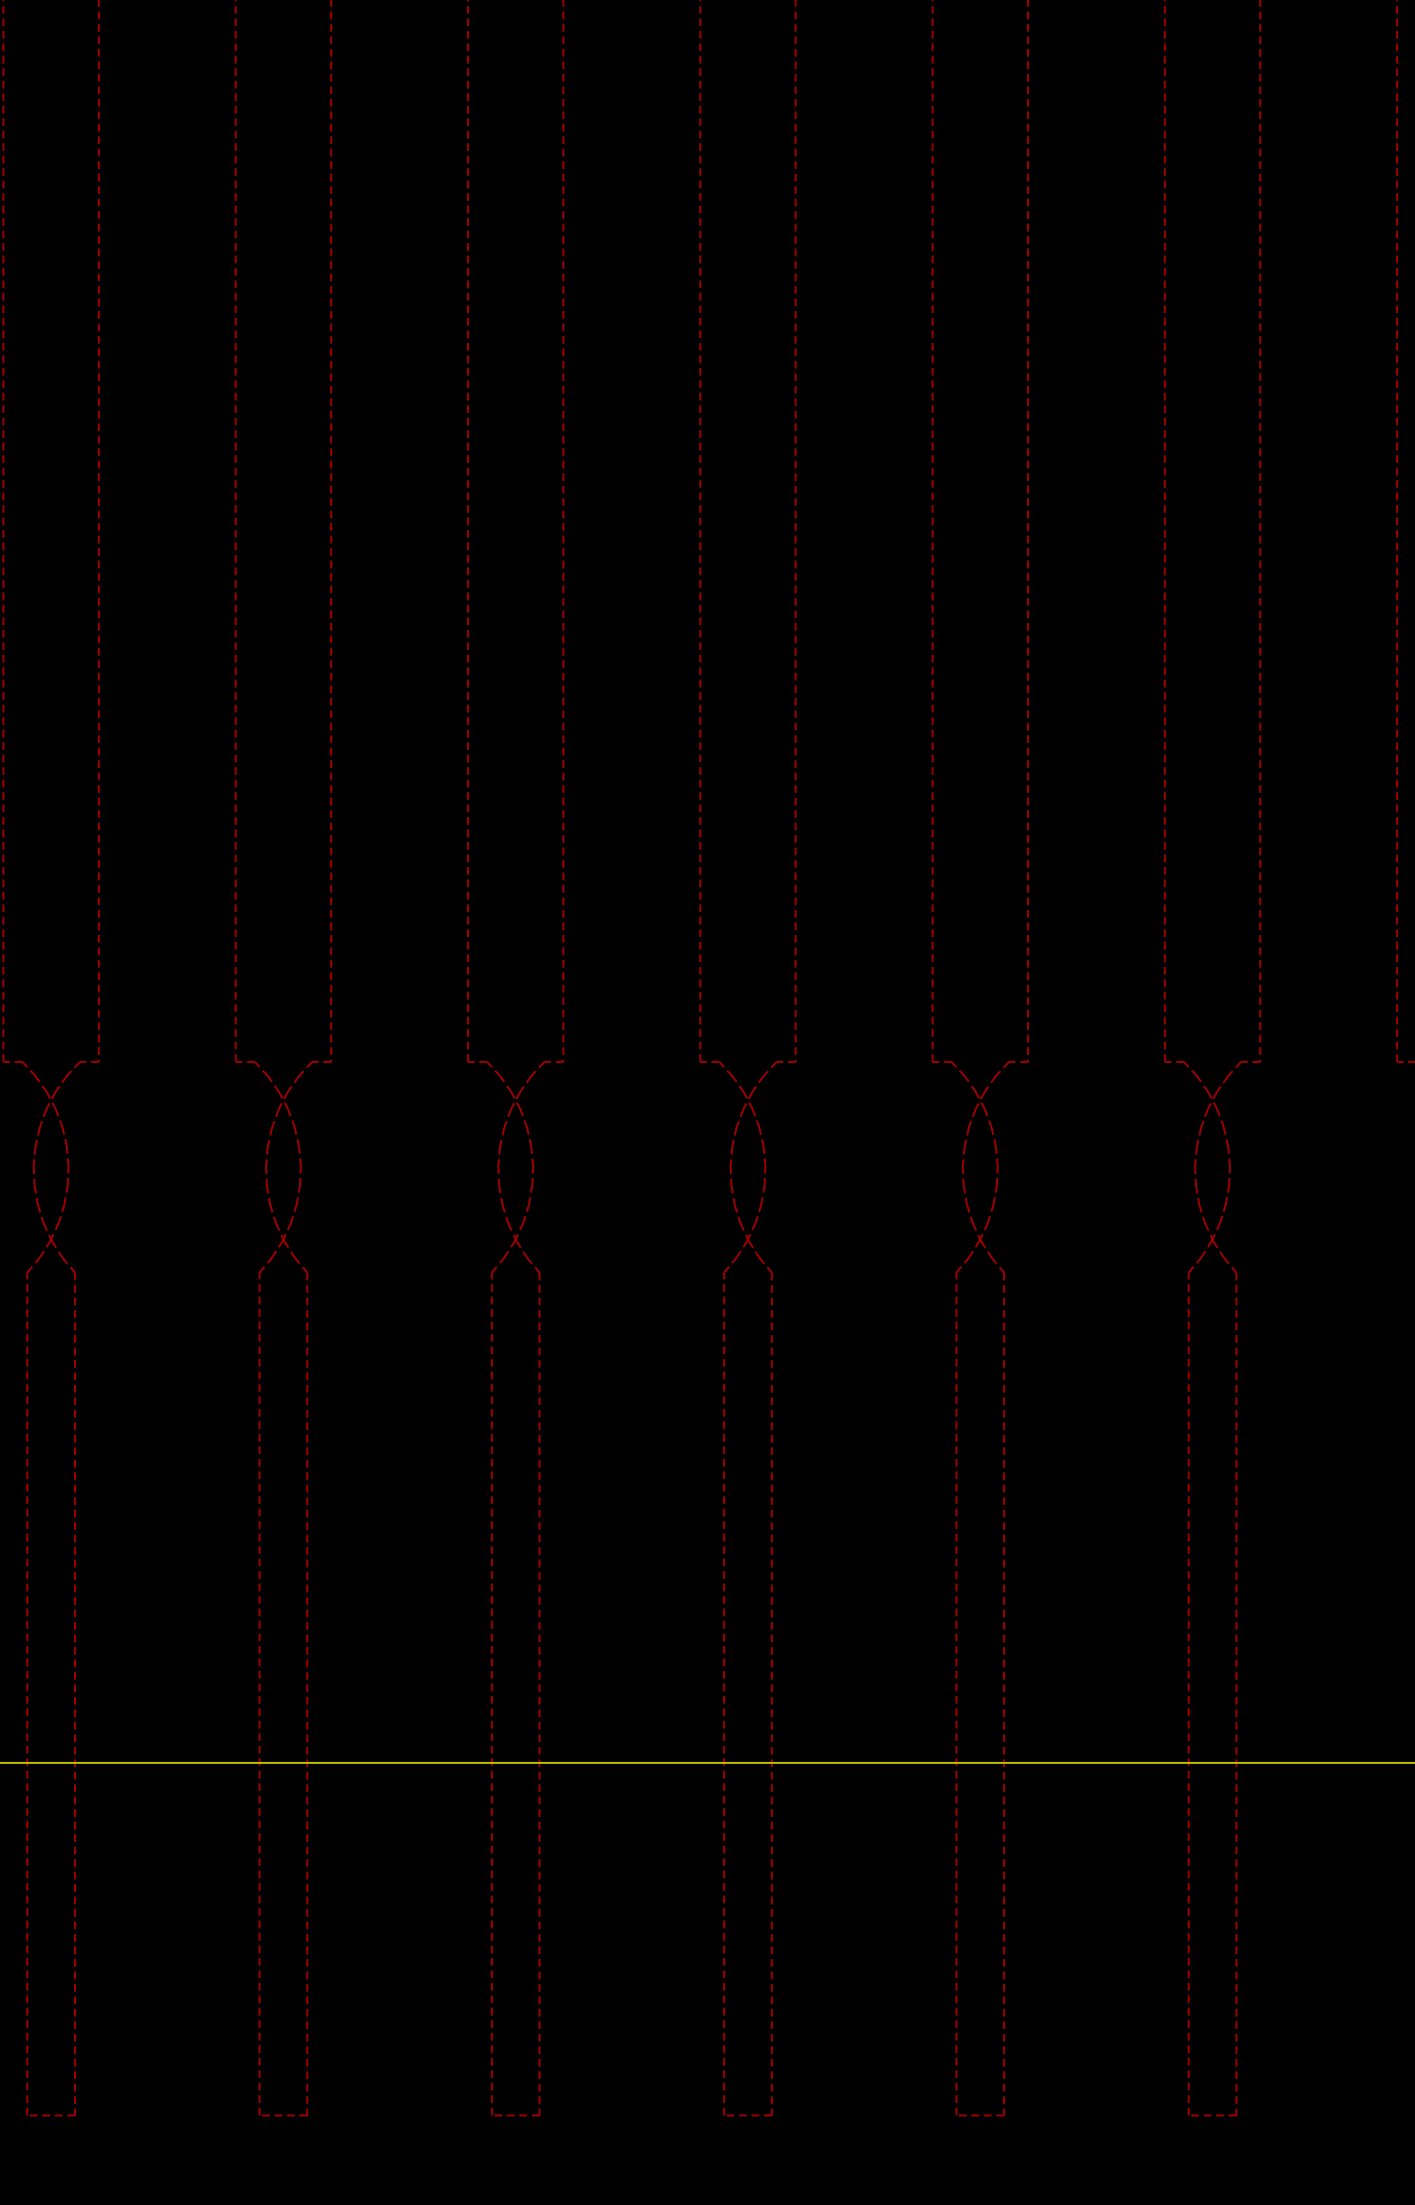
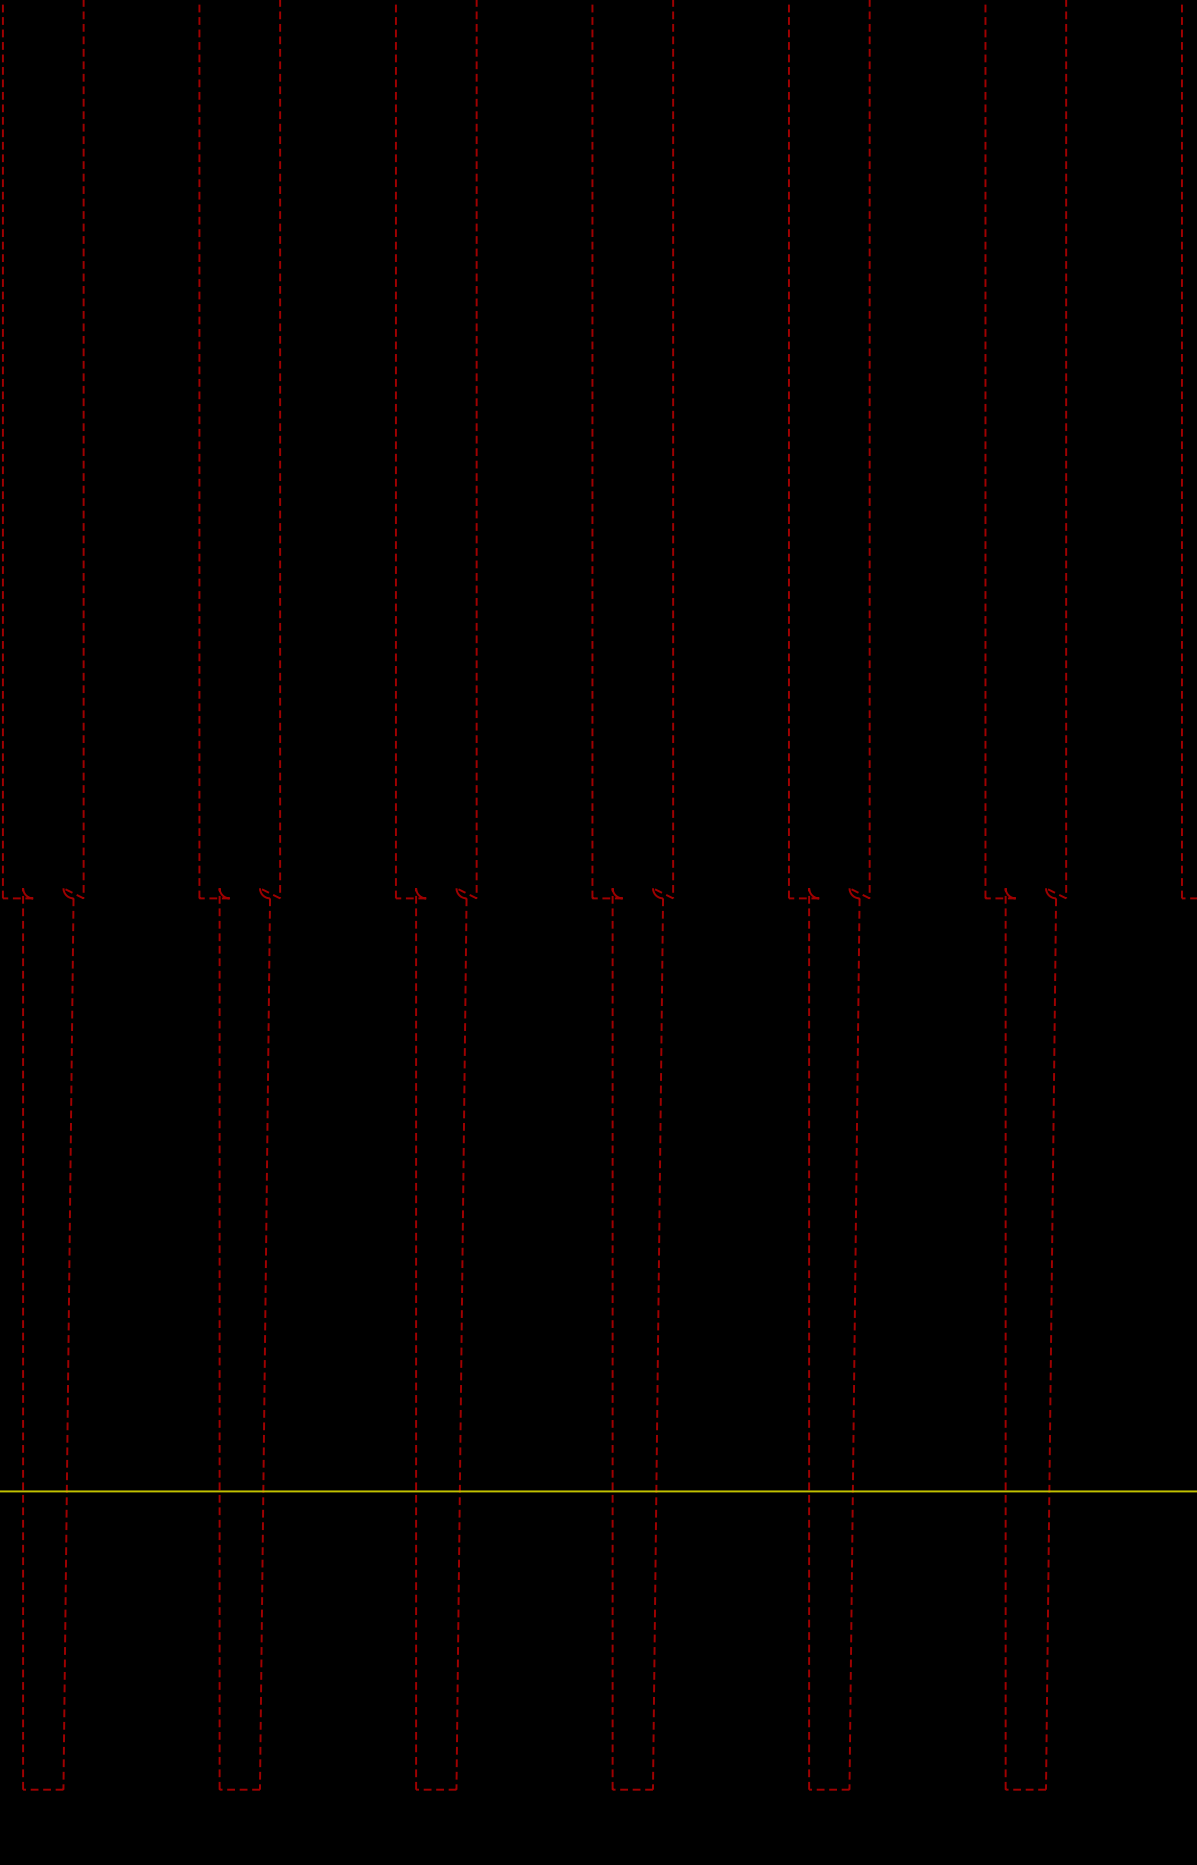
top zone outline: (22, 1061) (35, 1076) (55, 1109) (66, 1146) (68, 1166) (64, 1204) (58, 1223) (50, 1241) (27, 1272) -> (19, 898) (33, 898) (26, 895) (23, 888) (23, 1076)
top zone outline: (98, 1061) (79, 1061) (55, 1092) (39, 1127) (33, 1166) (34, 1185) (43, 1223) (62, 1257) (74, 1272) (74, 2115) -> (83, 898) (63, 888) (66, 895) (73, 898) (63, 1789)
top zone outline: (254, 1061) (267, 1076) (288, 1109) (299, 1146) (300, 1166) (296, 1204) (290, 1223) (282, 1241) (259, 1272) -> (215, 898) (229, 898) (222, 895) (219, 888) (219, 1076)
top zone outline: (331, 1061) (312, 1061) (287, 1092) (271, 1127) (266, 1166) (266, 1185) (276, 1223) (294, 1257) (307, 1272) (307, 2115) -> (280, 898) (259, 888) (262, 895) (270, 898) (259, 1789)
top zone outline: (487, 1061) (500, 1076) (520, 1109) (531, 1146) (533, 1166) (528, 1204) (523, 1223) (514, 1241) (491, 1272) -> (412, 898) (426, 898) (419, 895) (416, 888) (416, 1076)
top zone outline: (563, 1061) (544, 1061) (519, 1092) (504, 1127) (498, 1166) (499, 1185) (508, 1223) (527, 1257) (539, 1272) (539, 2115) -> (476, 898) (456, 888) (459, 895) (466, 898) (456, 1789)
top zone outline: (719, 1061) (732, 1076) (752, 1109) (763, 1146) (765, 1166) (761, 1204) (755, 1223) (747, 1241) (724, 1272) -> (608, 898) (622, 898) (615, 895) (612, 888) (612, 1076)
top zone outline: (795, 1061) (776, 1061) (752, 1092) (736, 1127) (730, 1166) (734, 1204) (740, 1223) (759, 1257) (771, 1272) (771, 2115) -> (673, 898) (652, 888) (655, 895) (663, 898) (652, 1789)
top zone outline: (951, 1061) (964, 1076) (985, 1109) (995, 1146) (997, 1166) (993, 1204) (987, 1223) (979, 1241) (956, 1272) -> (805, 898) (819, 898) (812, 895) (809, 888) (809, 1076)
top zone outline: (1027, 1061) (1008, 1061) (984, 1092) (968, 1127) (962, 1166) (963, 1185) (972, 1223) (991, 1257) (1004, 1272) (1004, 2115) -> (869, 898) (849, 888) (852, 895) (859, 898) (849, 1789)
top zone outline: (1183, 1061) (1197, 1076) (1217, 1109) (1228, 1146) (1229, 1166) (1225, 1204) (1219, 1223) (1211, 1241) (1188, 1272) -> (1001, 898) (1015, 898) (1008, 895) (1005, 888) (1005, 1076)
top zone outline: (1260, 1061) (1241, 1061) (1216, 1092) (1201, 1127) (1195, 1166) (1199, 1204) (1205, 1223) (1223, 1257) (1236, 1272) (1236, 2115) -> (1066, 898) (1045, 888) (1048, 895) (1056, 898) (1045, 1789)

